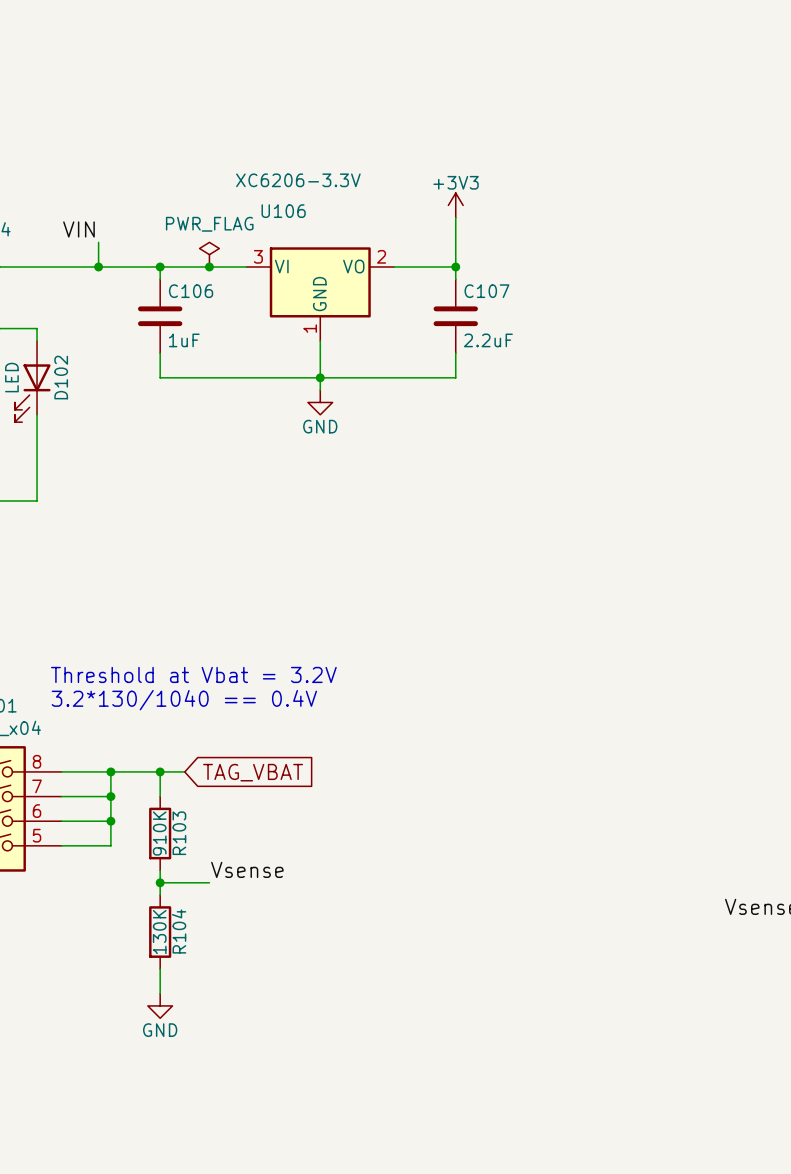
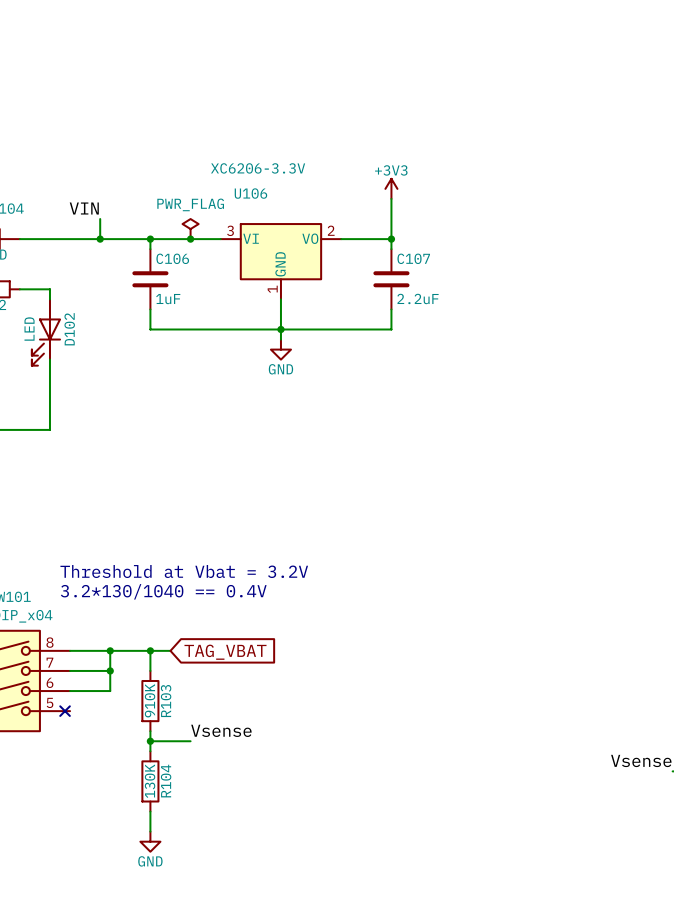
wire: (110, 821) (110, 845) (61, 845) -> none
junction: (110, 821) -> none
no-connect mark: none -> (65, 711)

